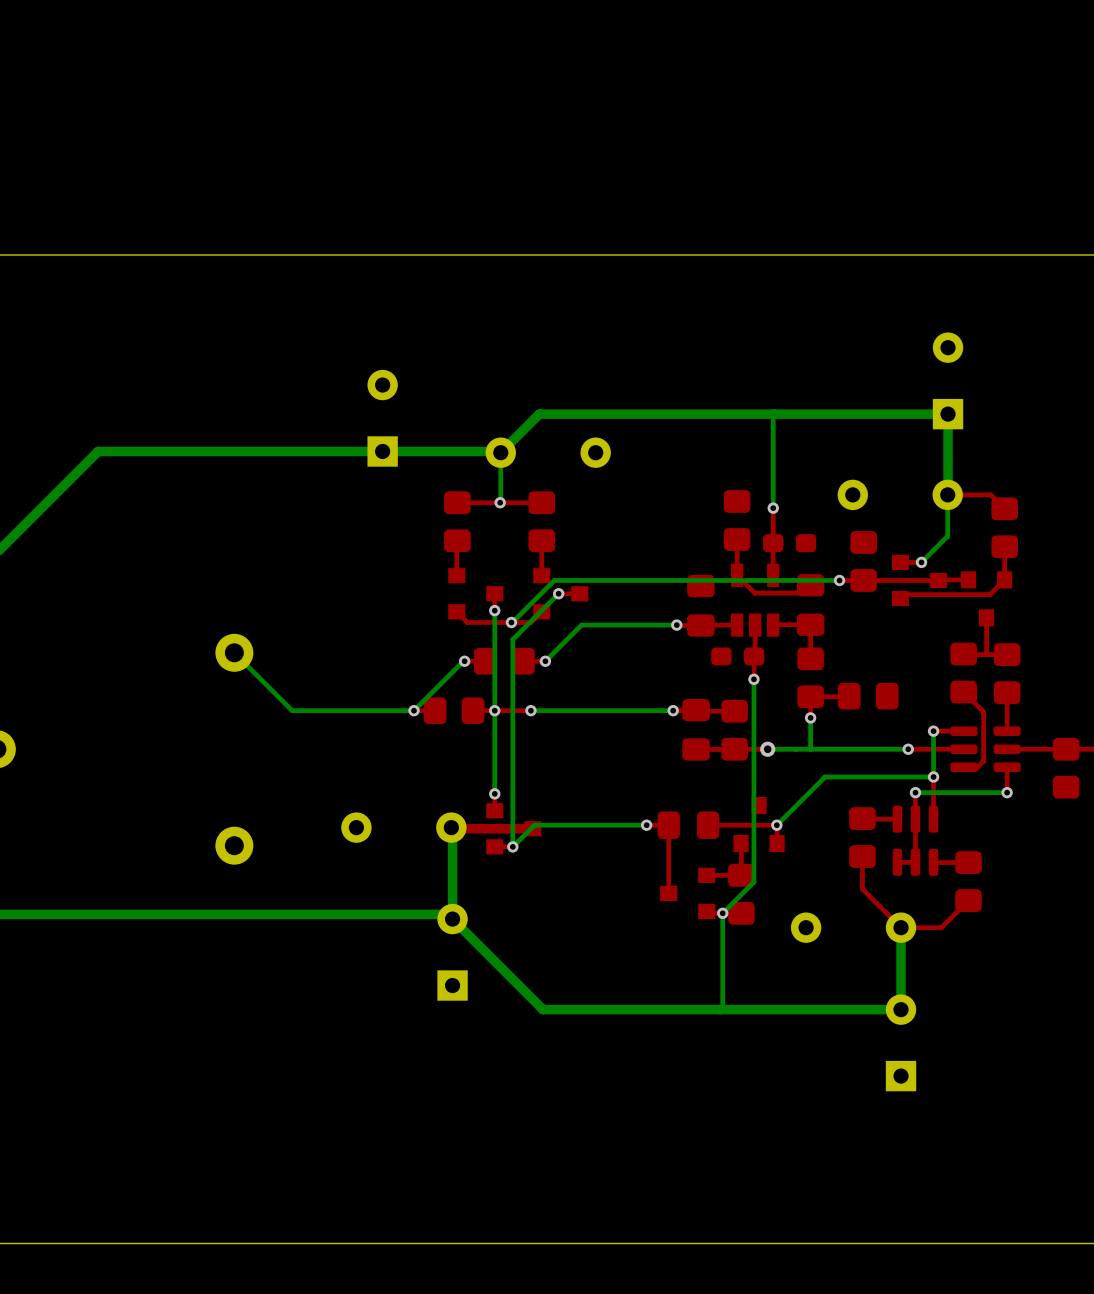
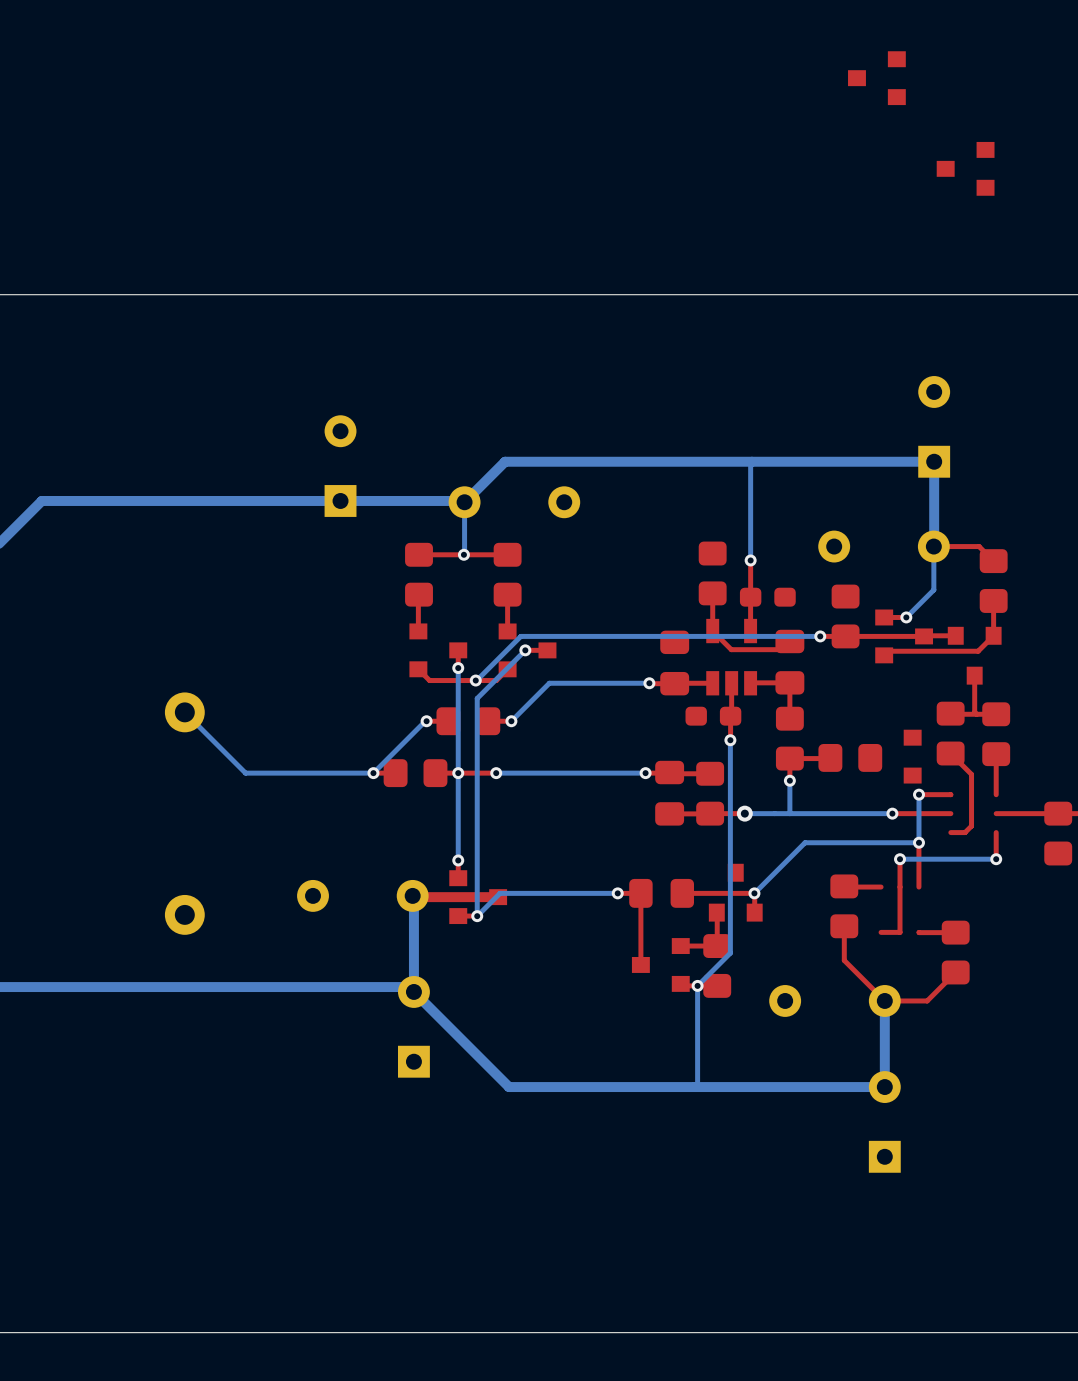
part: none -> (876, 78)
part: none -> (965, 168)
part: none -> (892, 756)
part: (985, 749) -> none
part: (915, 840) -> none

